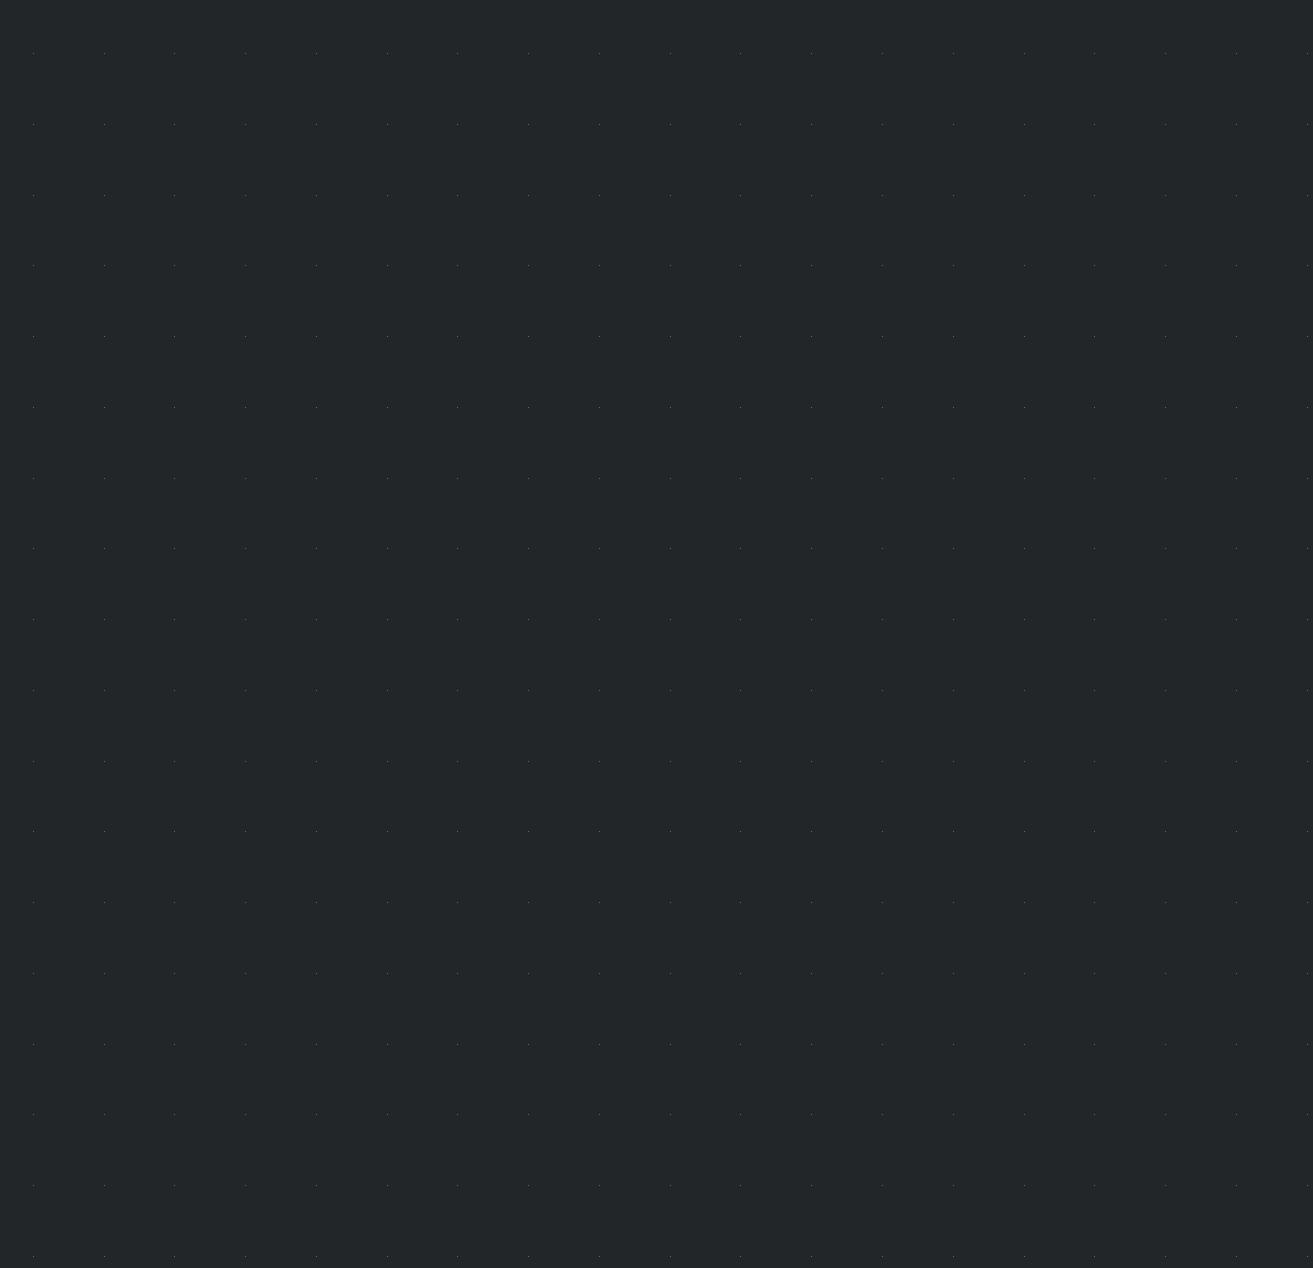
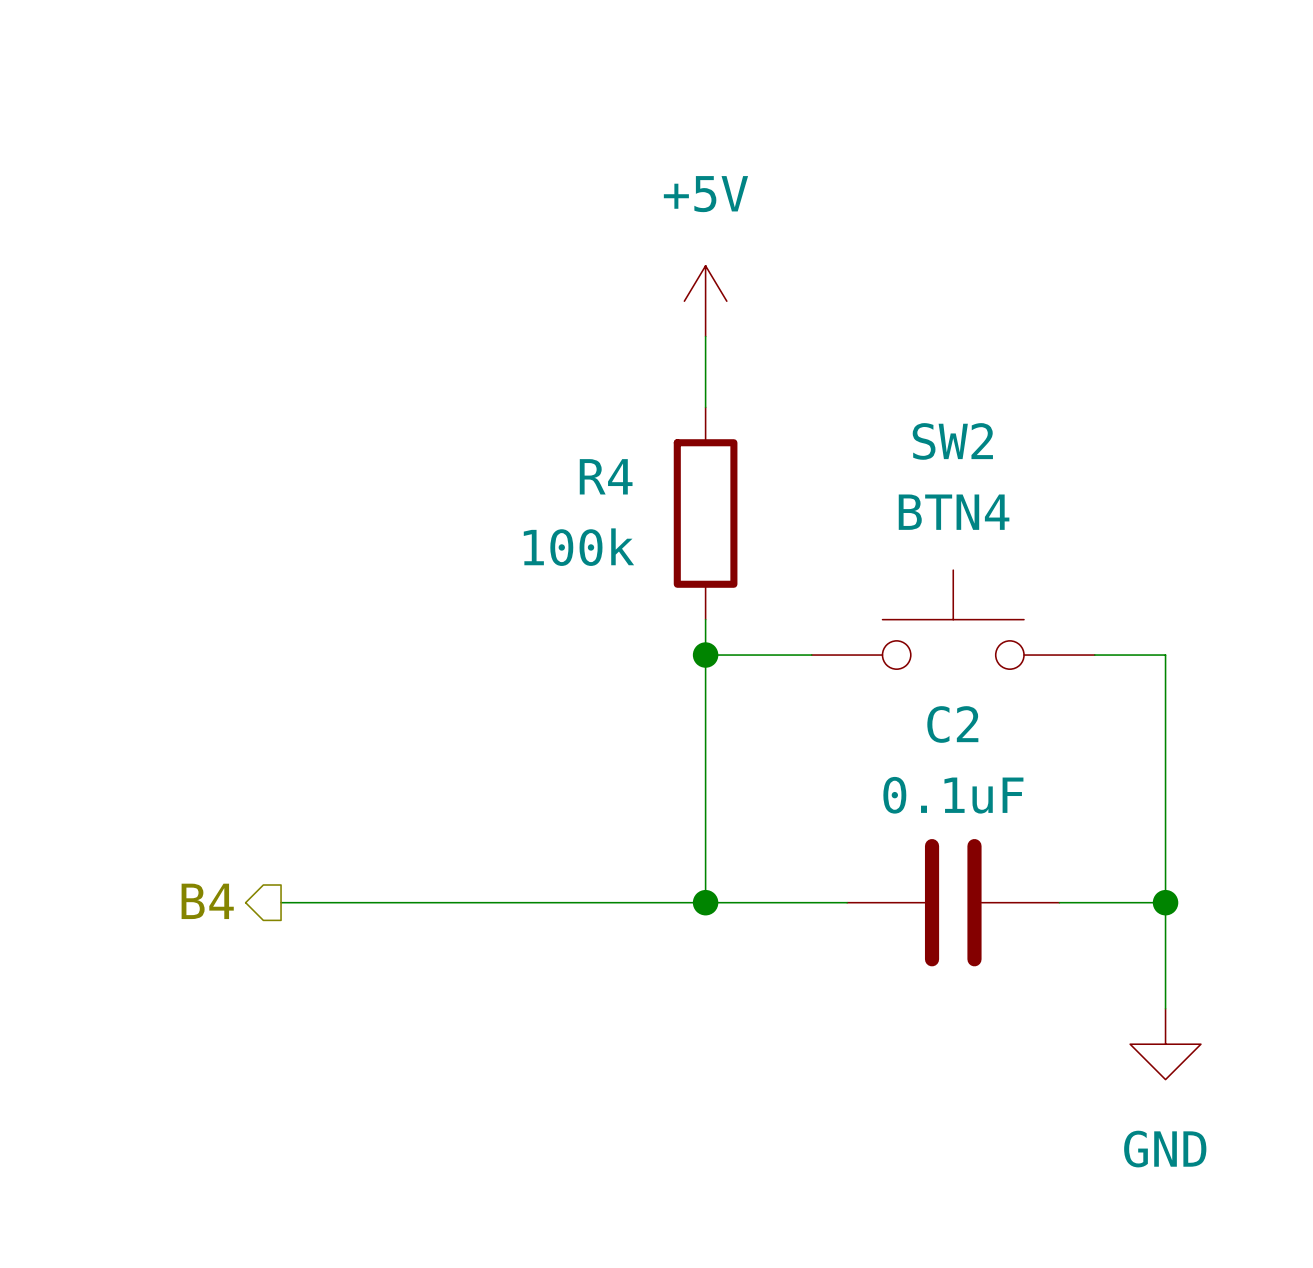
power symbol: none -> +5V (705, 301)
wire: none -> (705, 336) (705, 407)
R4: none -> 100k (705, 513)
wire: none -> (705, 619) (705, 902)
SW2: none -> BTN4 (953, 619)
wire: none -> (705, 655) (811, 655)
junction: none -> (705, 655)
wire: none -> (1094, 655) (1165, 655) (1165, 1008)
hierarchical label: none -> B4 (207, 901)
wire: none -> (281, 902) (847, 902)
junction: none -> (705, 902)
C2: none -> 0.1uF (953, 902)
wire: none -> (1059, 902) (1165, 902)
junction: none -> (1165, 902)
power symbol: none -> GND (1165, 1044)

